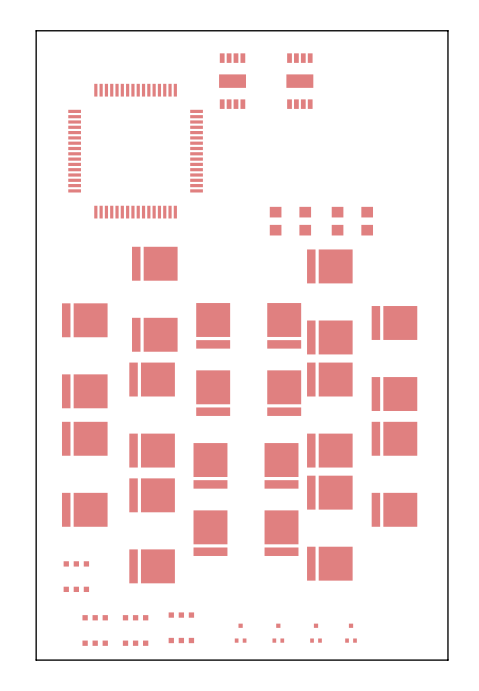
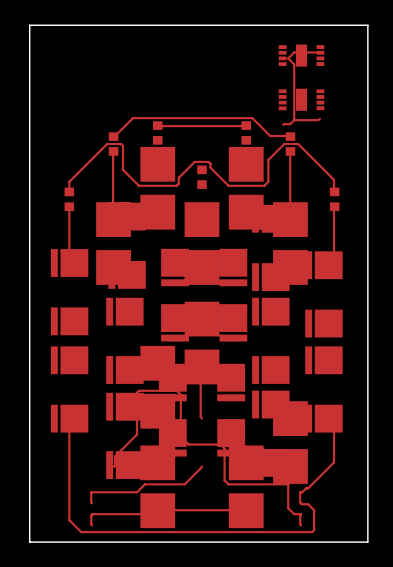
top track: none -> (319, 52) (294, 52) (288, 58) (294, 64) (294, 120)
part: none -> (301, 55)
part: (232, 81) -> none
part: (299, 81) -> none
part: none -> (301, 99)
top track: none -> (319, 119) (294, 120)
top track: none -> (294, 120) (290, 124) (283, 124)
part: (135, 151) -> none
top track: none -> (246, 125) (157, 125)
part: none -> (157, 132)
part: none -> (246, 132)
top track: none -> (290, 136) (270, 136) (252, 118) (133, 118) (113, 136)
part: none -> (113, 144)
part: none -> (290, 144)
top track: none -> (113, 151) (113, 219)
top track: none -> (290, 151) (290, 219)
part footprint: [299, 206, 312, 236] -> [228, 146, 264, 230]
part position: (275, 221) -> (202, 177)
part: (337, 221) -> none
part: (367, 221) -> none
part: none -> (157, 188)
top track: none -> (334, 191) (334, 179) (298, 144) (284, 144) (268, 159) (268, 181) (264, 185) (228, 185) (210, 167) (208, 161) (194, 161) (178, 177) (176, 185) (138, 185) (123, 169) (123, 146) (121, 144) (107, 144) (69, 181) (69, 191)
part: none -> (69, 199)
part: none -> (334, 199)
top track: none -> (69, 206) (69, 274)
top track: none -> (334, 206) (334, 274)
part: none -> (113, 243)
part: none -> (202, 243)
part: none -> (290, 243)
part: none -> (202, 343)
top track: none -> (202, 366) (202, 418)
part: none -> (157, 387)
top track: none -> (334, 422) (334, 462) (308, 488) (300, 492) (300, 503) (308, 504) (314, 510) (314, 530) (312, 532) (81, 532) (69, 520) (69, 422)
part: none -> (290, 442)
top track: none -> (113, 466) (115, 466) (115, 456) (136, 434) (136, 392) (138, 390) (176, 390) (180, 394) (180, 436) (188, 444) (220, 444) (224, 448) (224, 480) (228, 484) (288, 484)
top track: none -> (202, 466) (184, 484) (144, 484) (136, 492) (91, 492) (91, 503)
top track: none -> (290, 466) (288, 470) (288, 508) (294, 514) (300, 514) (300, 525)
part: (76, 576) -> none
part: none -> (157, 486)
part: none -> (246, 486)
top track: none -> (246, 510) (158, 510) (154, 514) (93, 514) (91, 516) (91, 525)
part: (181, 627) -> none
part: (95, 630) -> none
part: (135, 630) -> none
part: (240, 633) -> none
part: (278, 633) -> none
part: (316, 633) -> none
part: (351, 633) -> none

